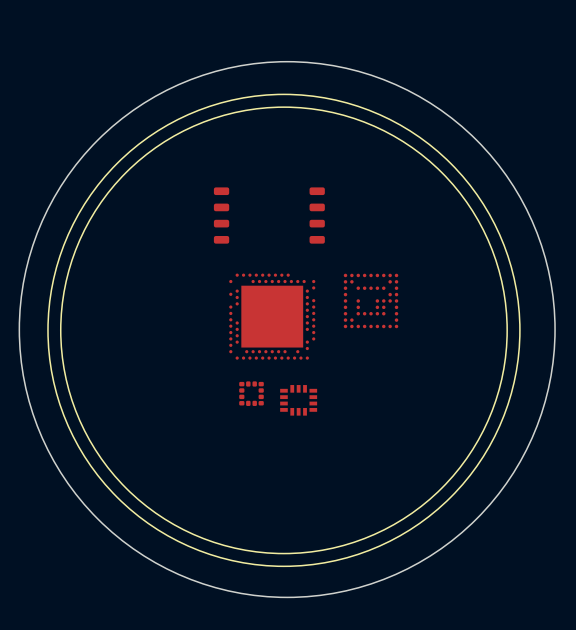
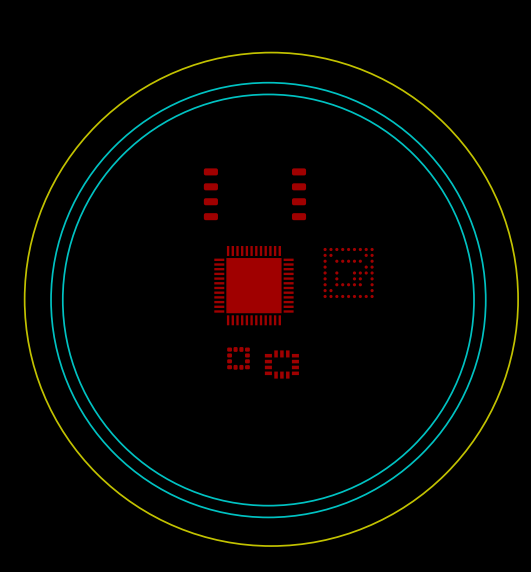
part footprint: [229, 273, 316, 360] -> [214, 245, 294, 326]

